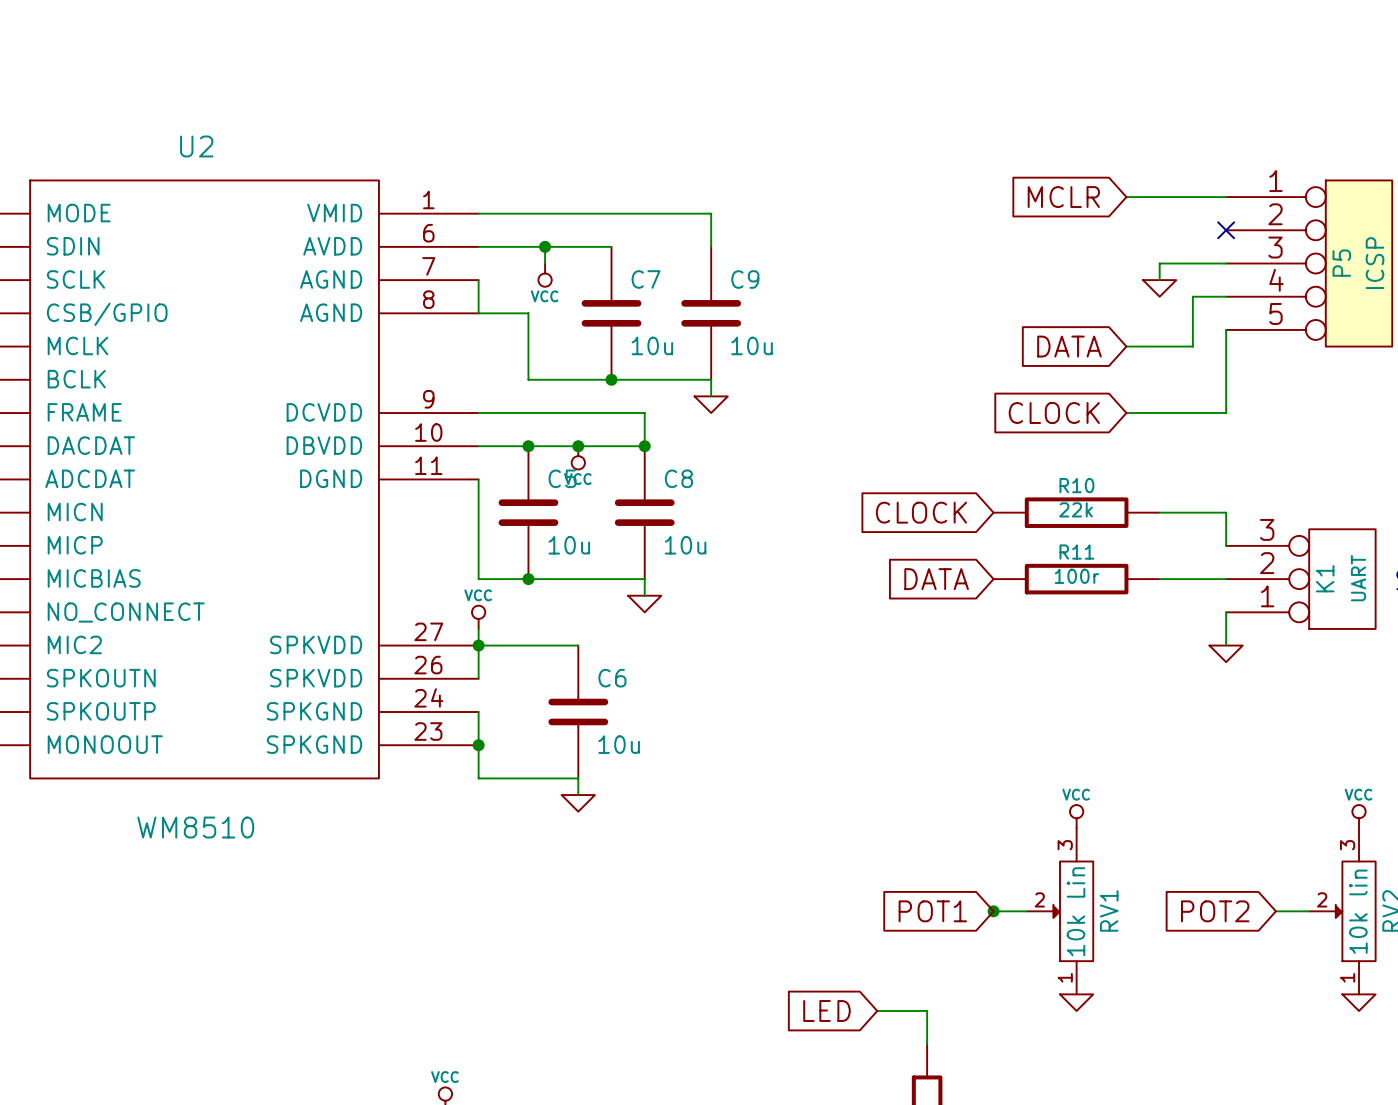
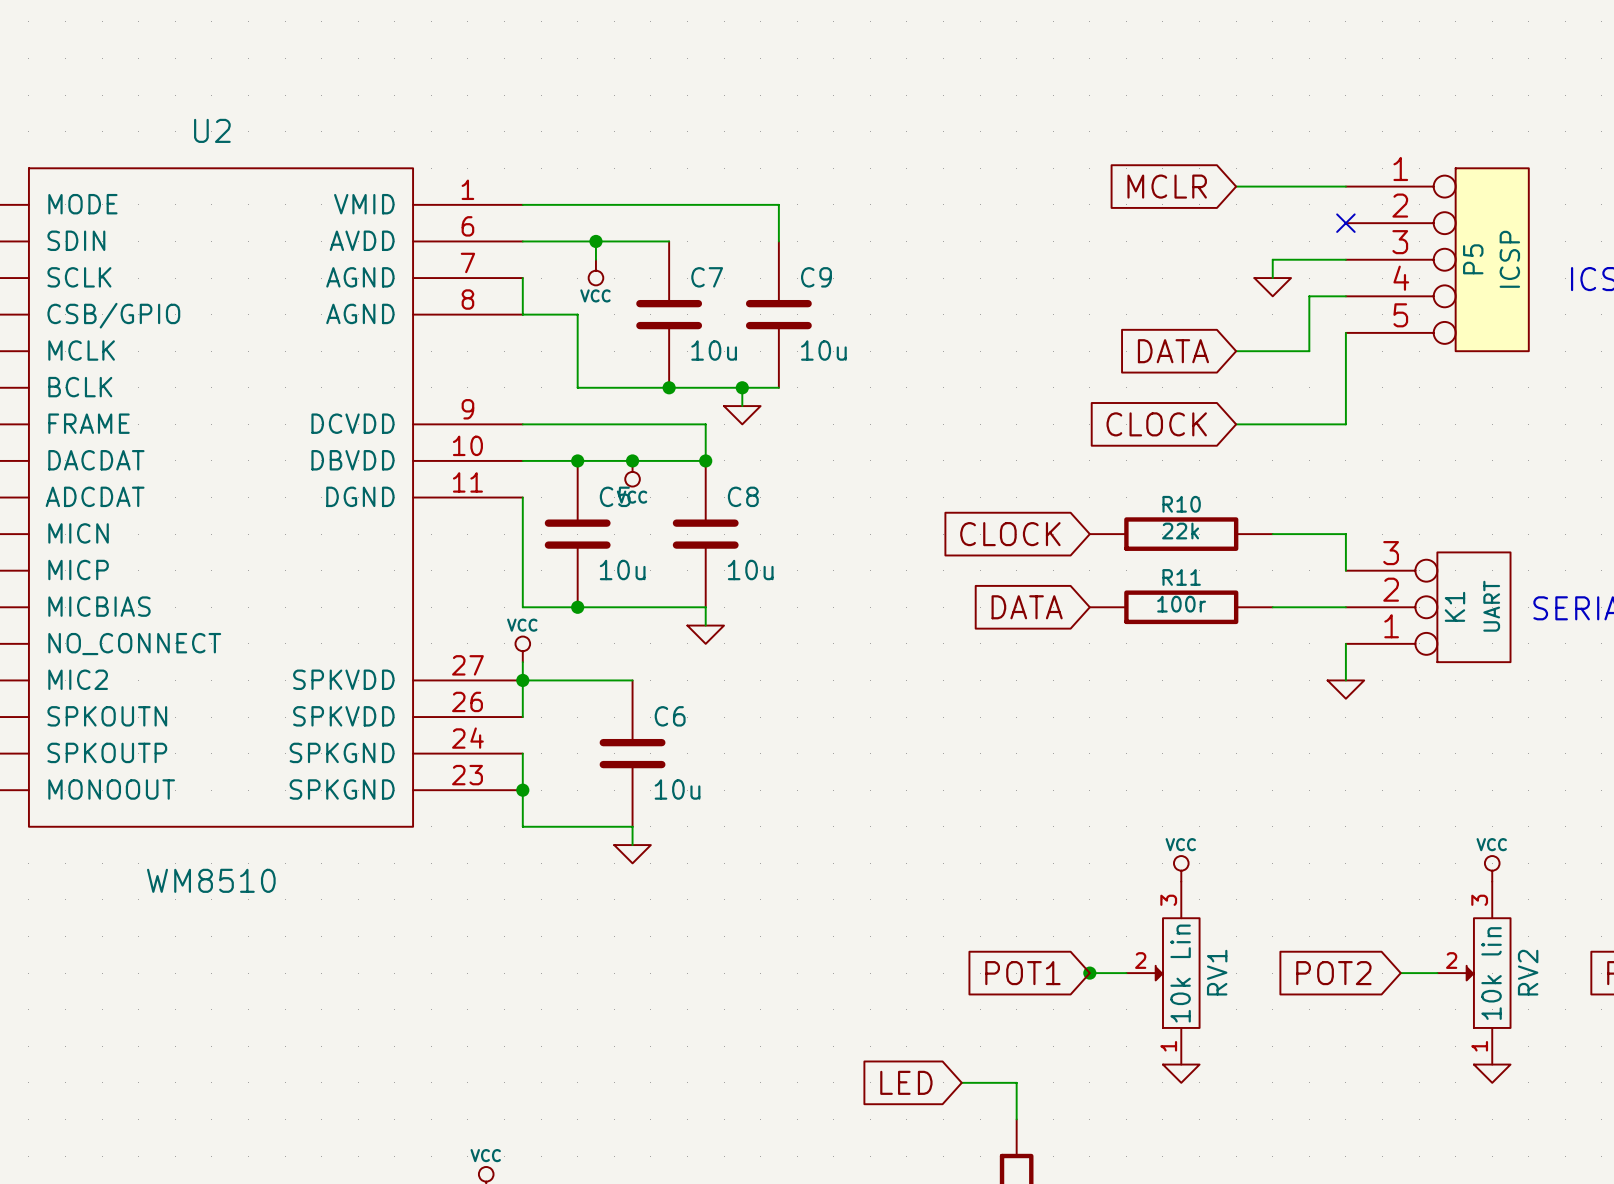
junction: none -> (742, 387)
wire: (711, 379) (711, 396) -> (742, 387) (742, 406)
power symbol position: (711, 404) -> (742, 415)

